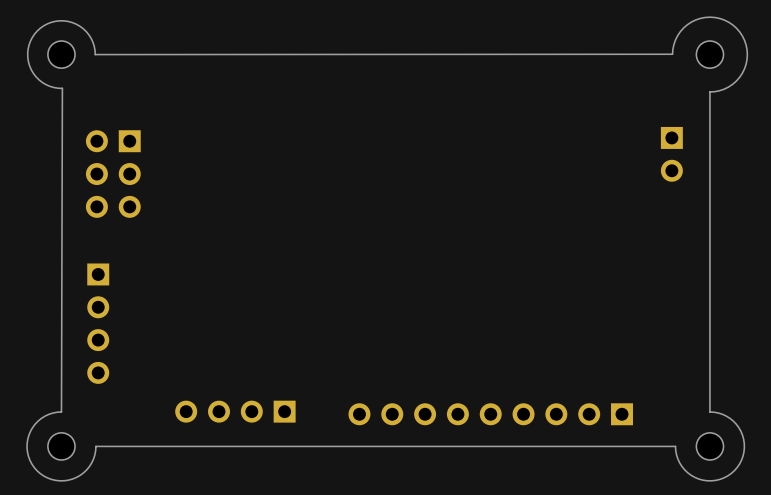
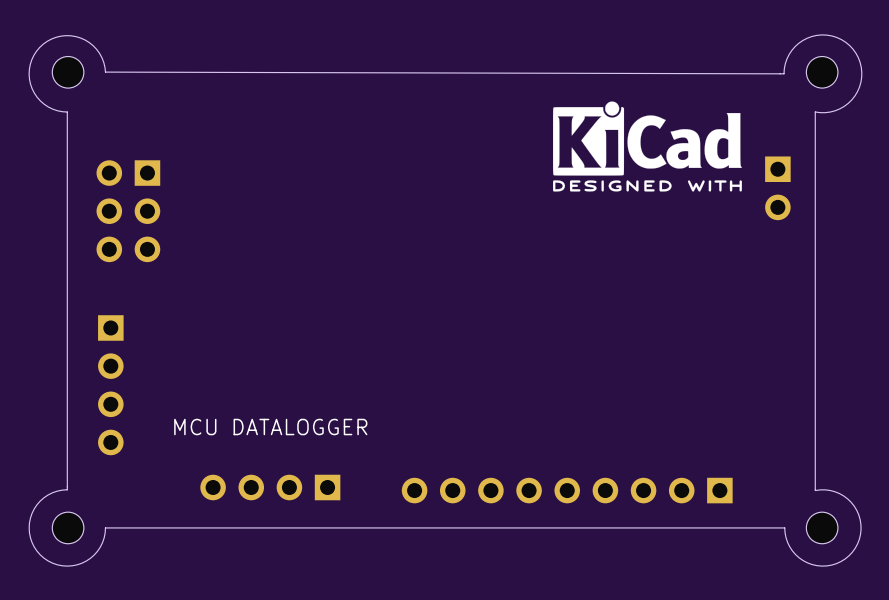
drawing: none -> [552, 101, 742, 192]
text: none -> MCU DATALOGGER (270, 427)
board edge: none -> (815, 490) (825, 489) (839, 493) (847, 498) (856, 510) (861, 529) (857, 543) (852, 552) (845, 558) (831, 565) (812, 564) (803, 560) (792, 550) (786, 537) (784, 527) (782, 527)
board edge: (675, 446) (677, 458) (684, 469) (694, 477) (707, 480) (719, 479) (734, 470) (741, 460) (744, 447) (742, 435) (736, 424) (726, 416) (709, 411) (709, 92) (724, 89) (736, 81) (744, 68) (747, 54) (744, 40) (736, 28) (728, 22) (715, 17) (700, 18) (683, 27) (675, 39) (672, 54) (95, 54) (91, 38) (83, 28) (76, 24) (59, 20) (43, 25) (32, 37) (28, 49) (27, 58) (31, 70) (39, 79) (49, 86) (62, 88) (61, 411) (48, 414) (35, 424) (27, 439) (27, 452) (31, 464) (40, 473) (51, 479) (64, 480) (76, 477) (86, 469) (93, 458) (95, 446) -> (815, 490) (815, 111) (835, 110) (848, 103) (857, 91) (861, 77) (858, 57) (853, 49) (841, 39) (822, 34) (803, 40) (789, 54) (784, 73) (105, 72) (101, 57) (93, 45) (80, 38) (66, 35) (51, 38) (39, 47) (31, 59) (29, 74) (32, 88) (40, 101) (52, 109) (67, 112) (67, 489) (52, 492) (37, 504) (30, 518) (29, 532) (32, 542) (40, 554) (52, 563) (67, 566) (81, 563) (94, 554) (102, 542) (105, 527) (108, 527)

